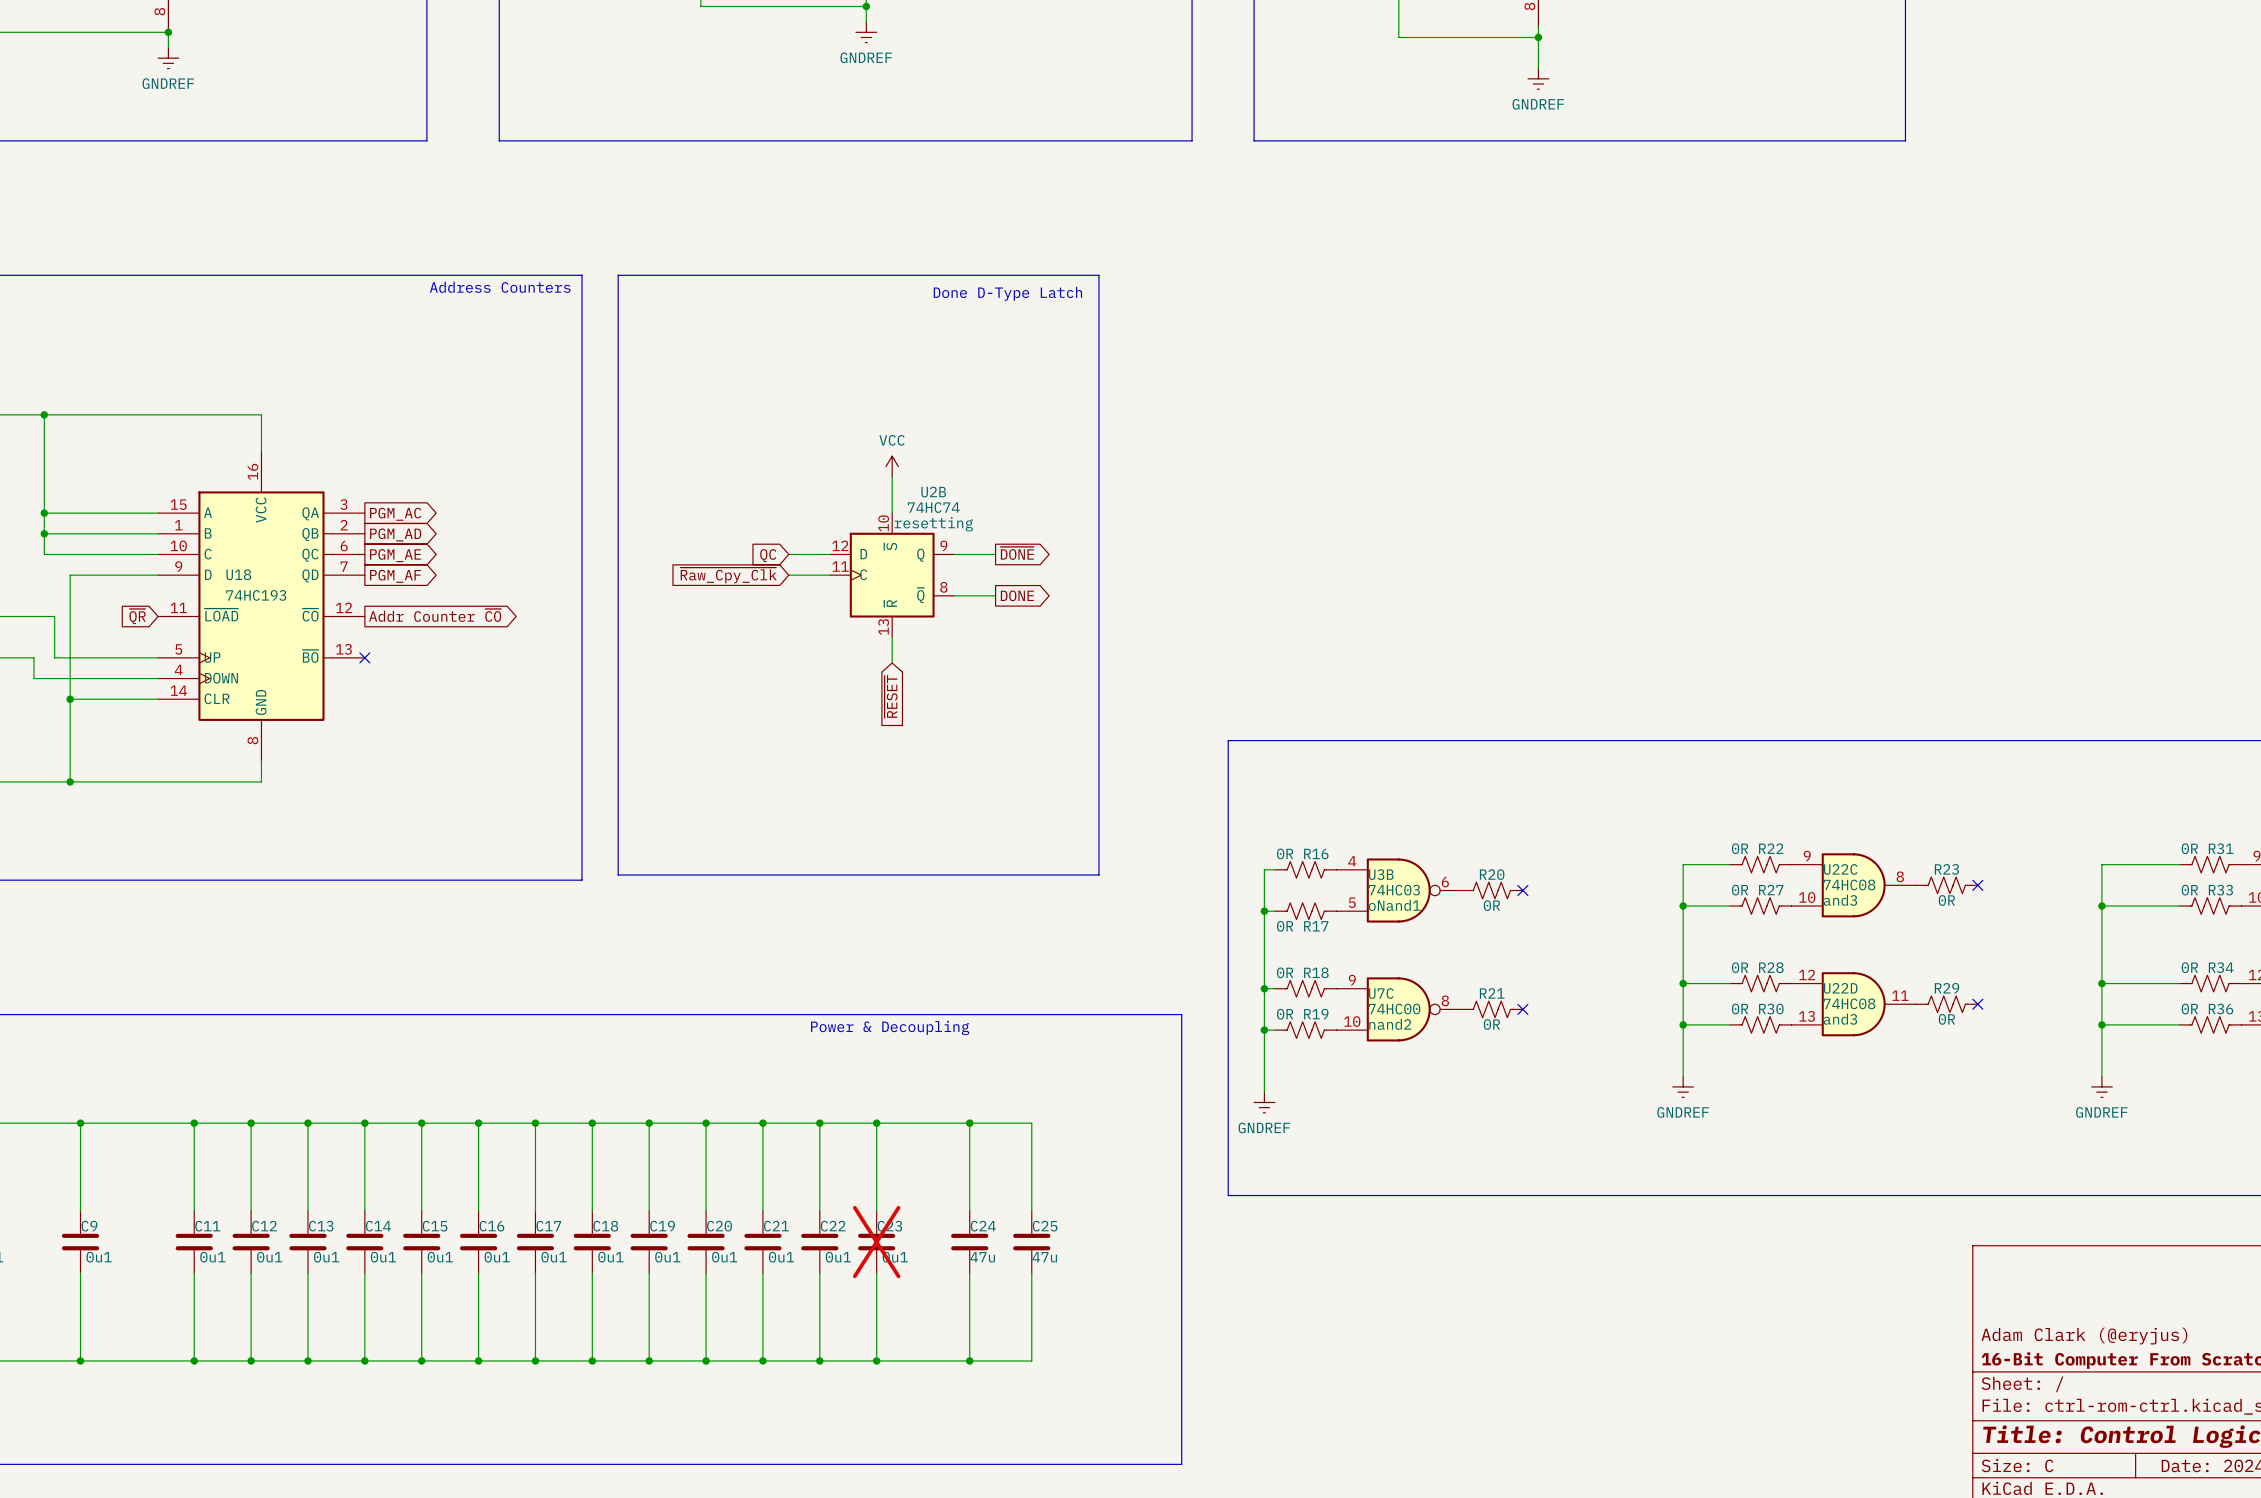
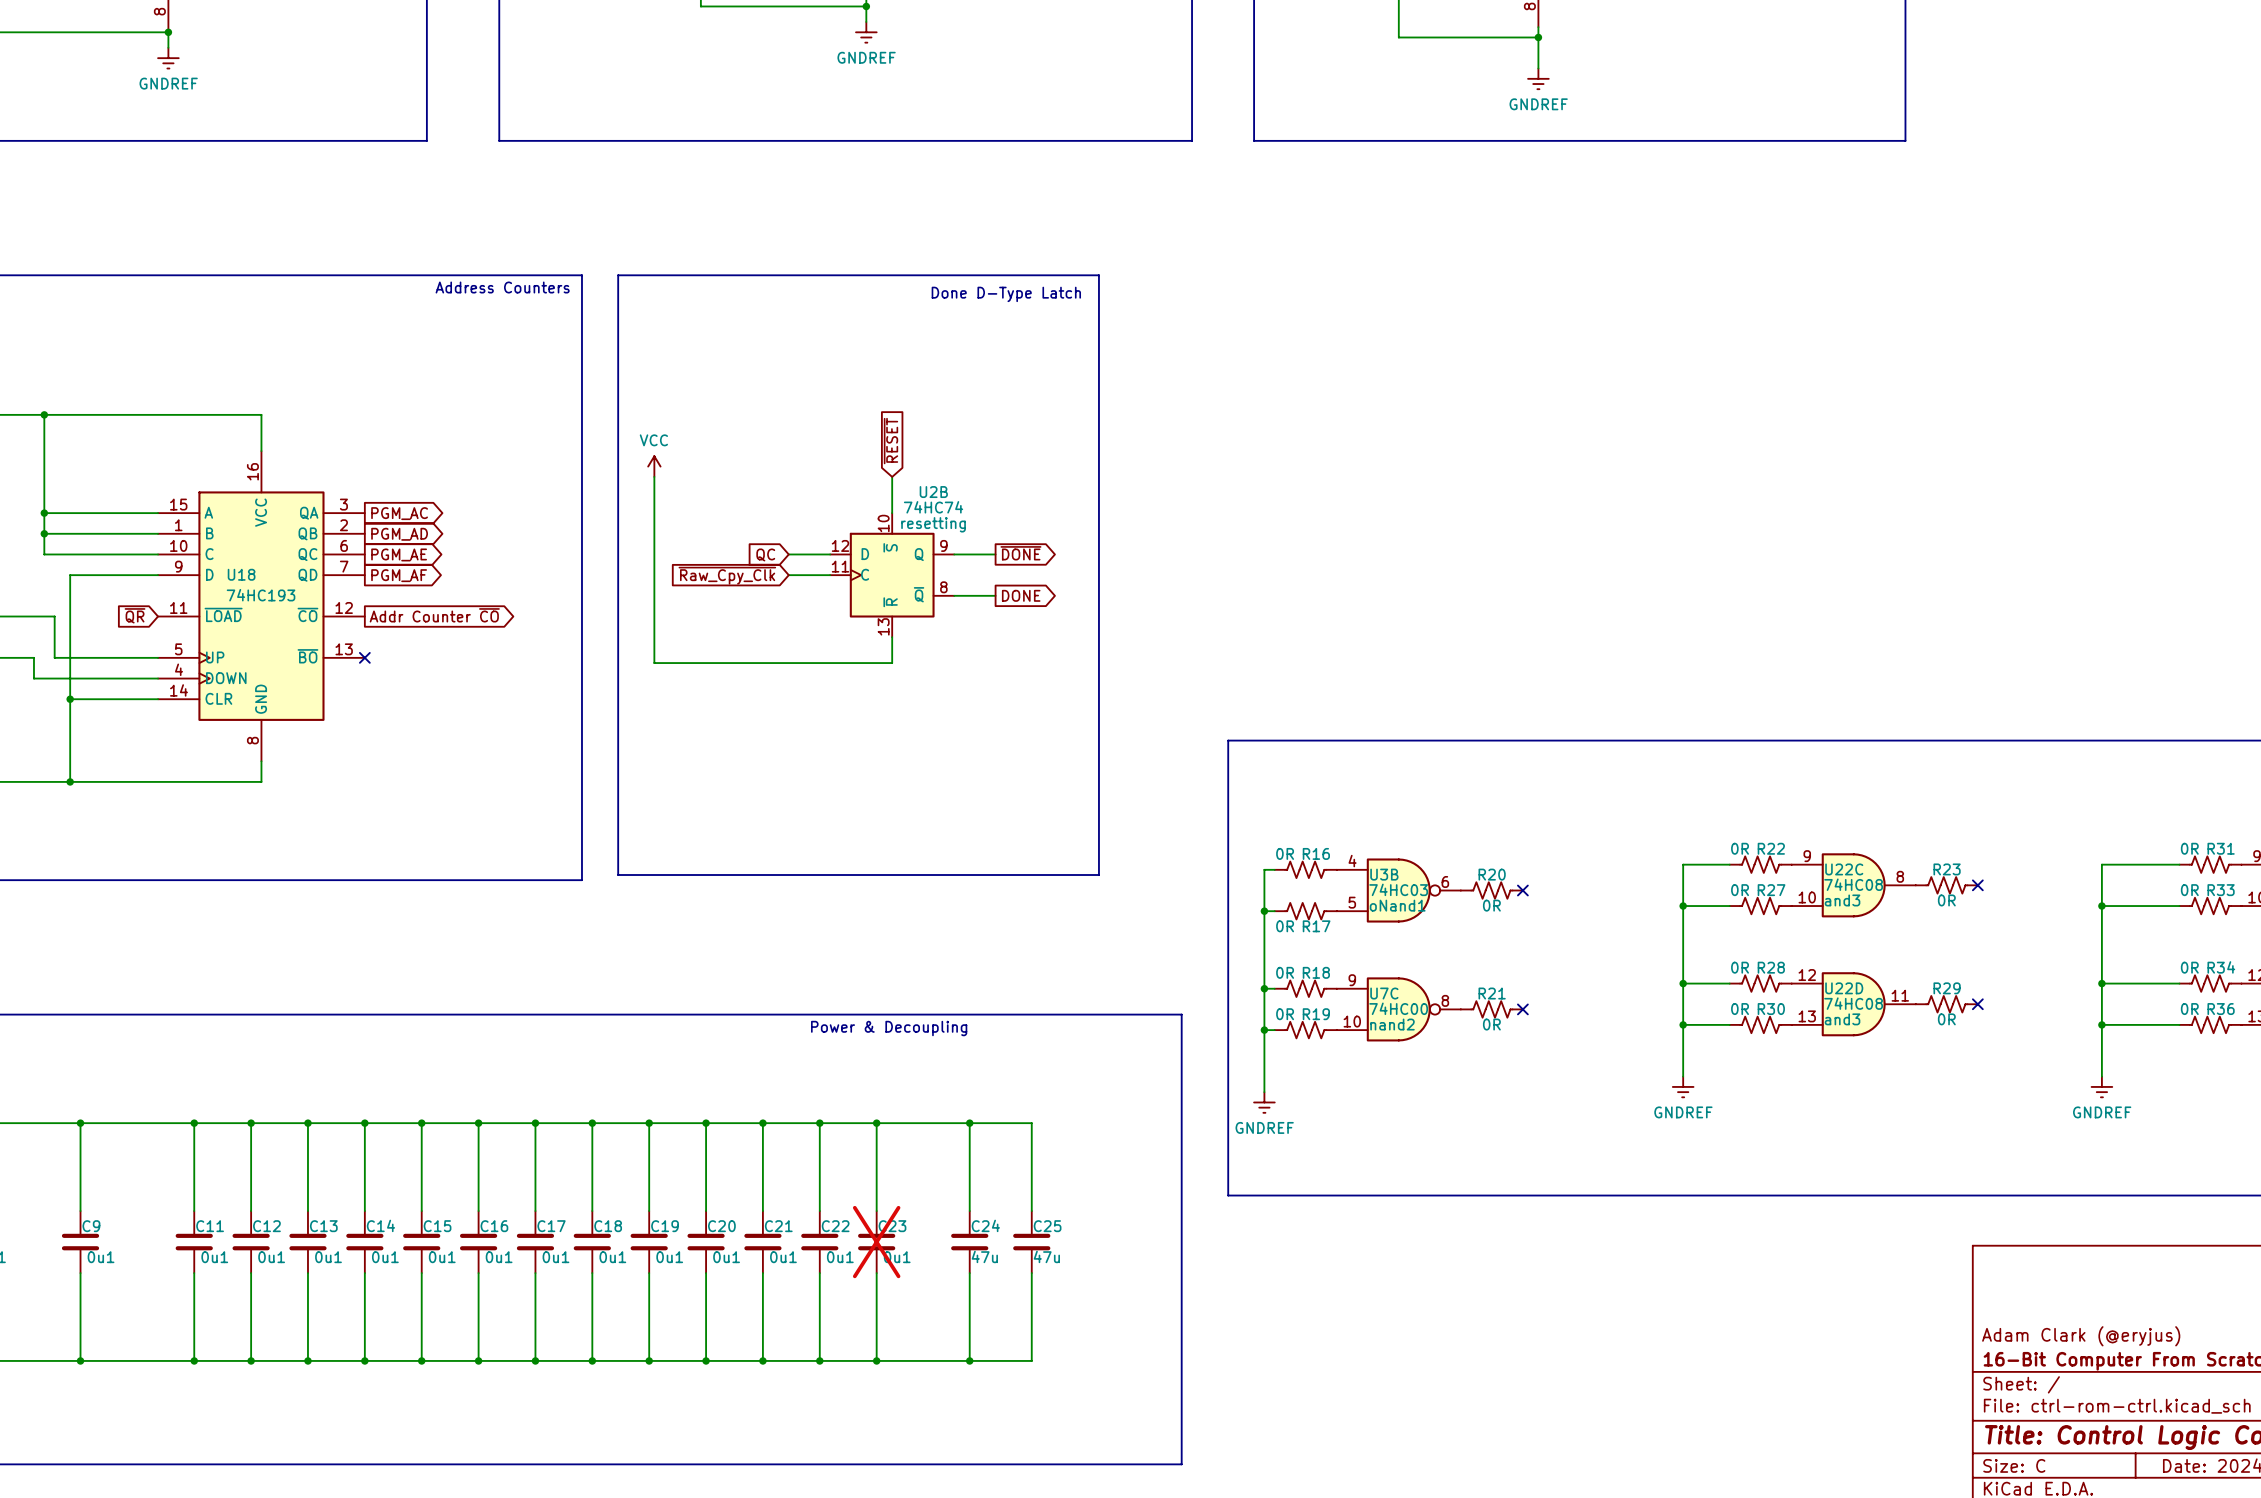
power symbol: none -> VCC (654, 466)
power symbol: VCC (892, 466) -> none
wire: none -> (654, 476) (654, 663) (892, 663)
global label rotation: 0° (891, 696) -> 180° (890, 441)
global label position: ~{RESET} (891, 696) -> ~{RESET} (890, 441)

